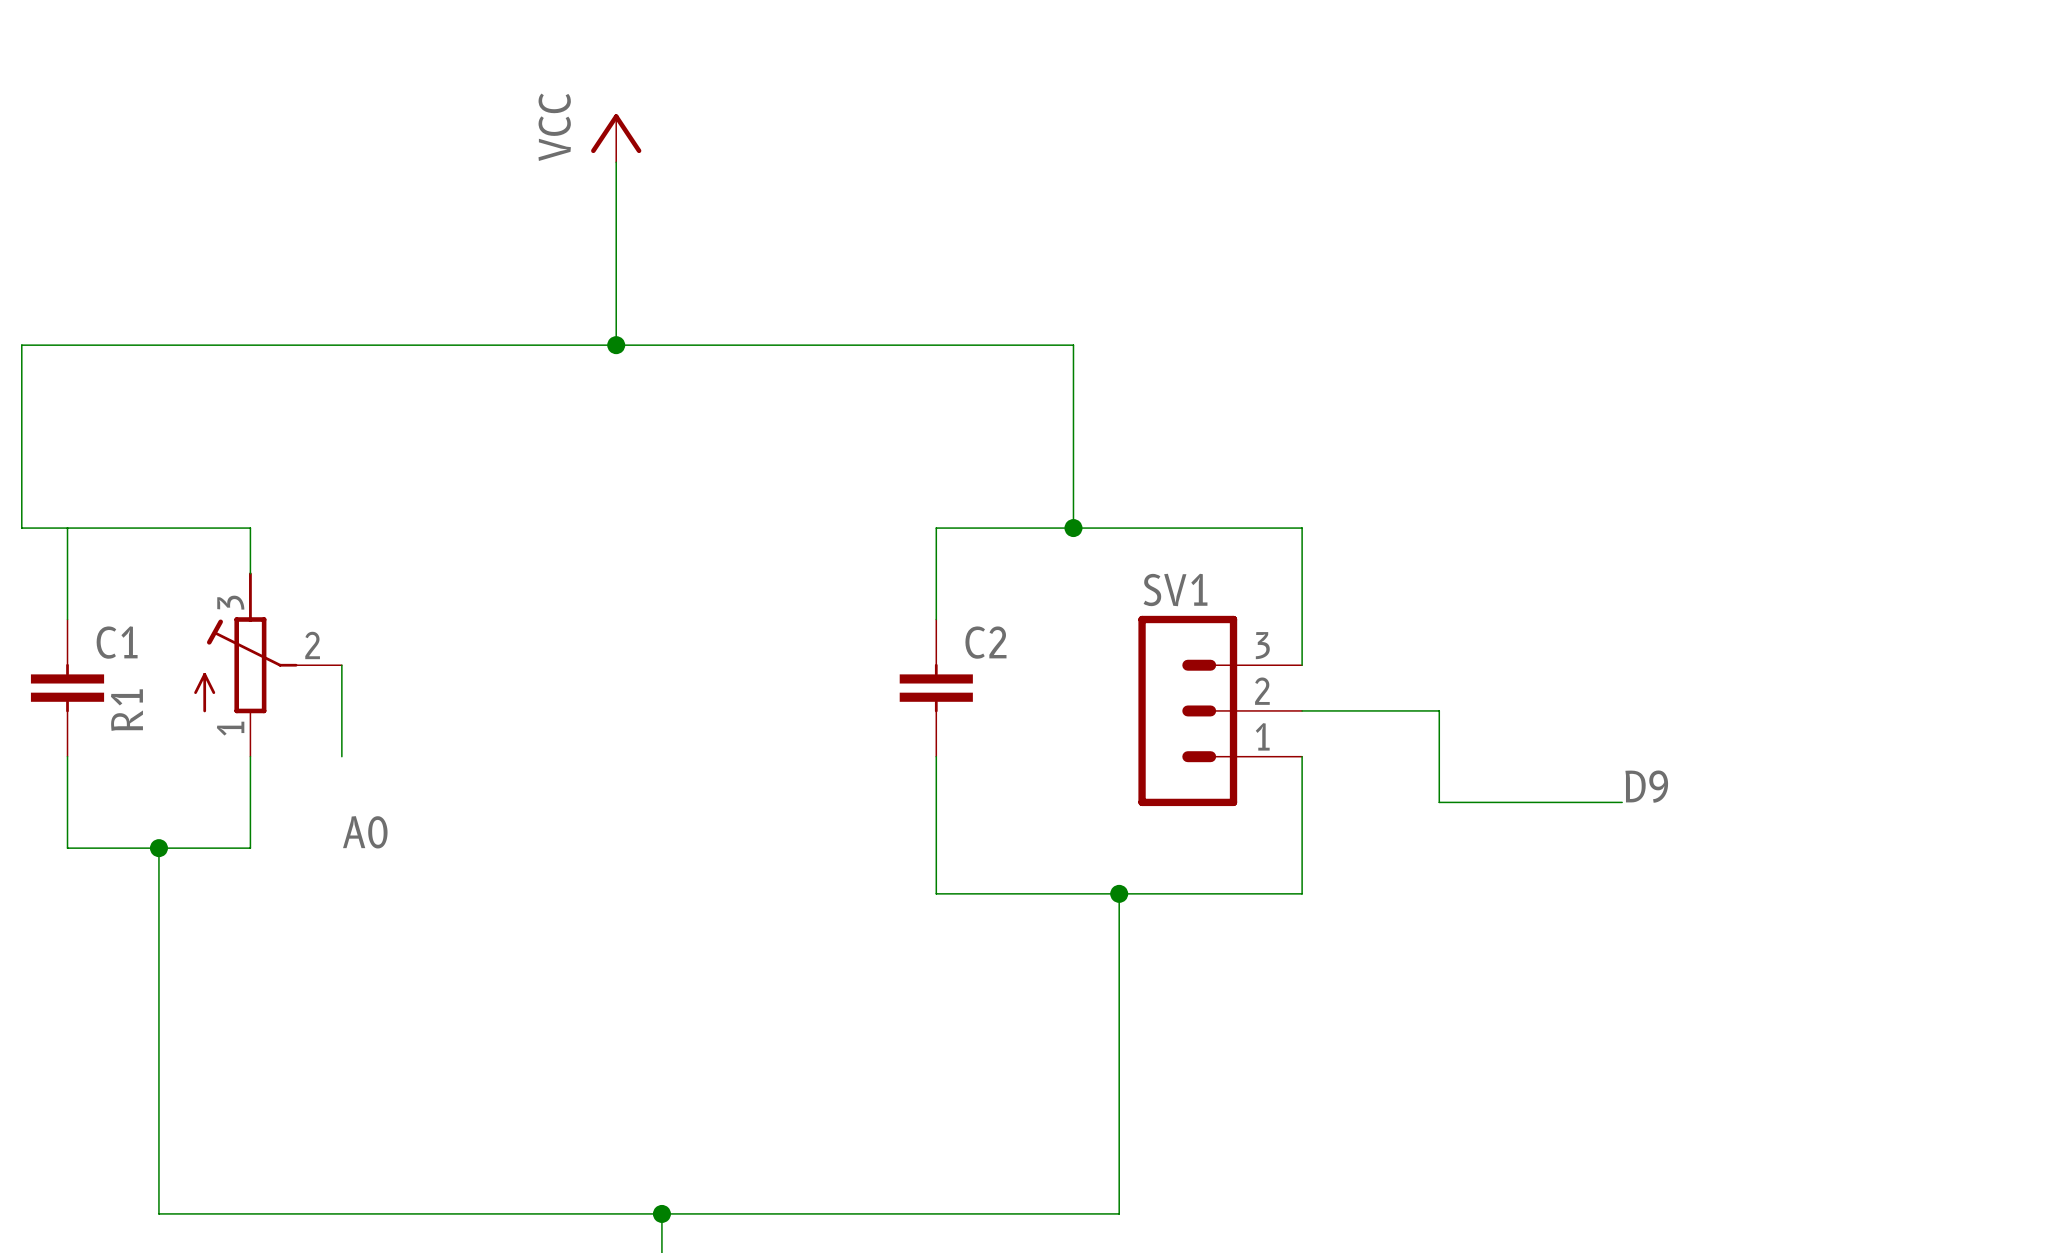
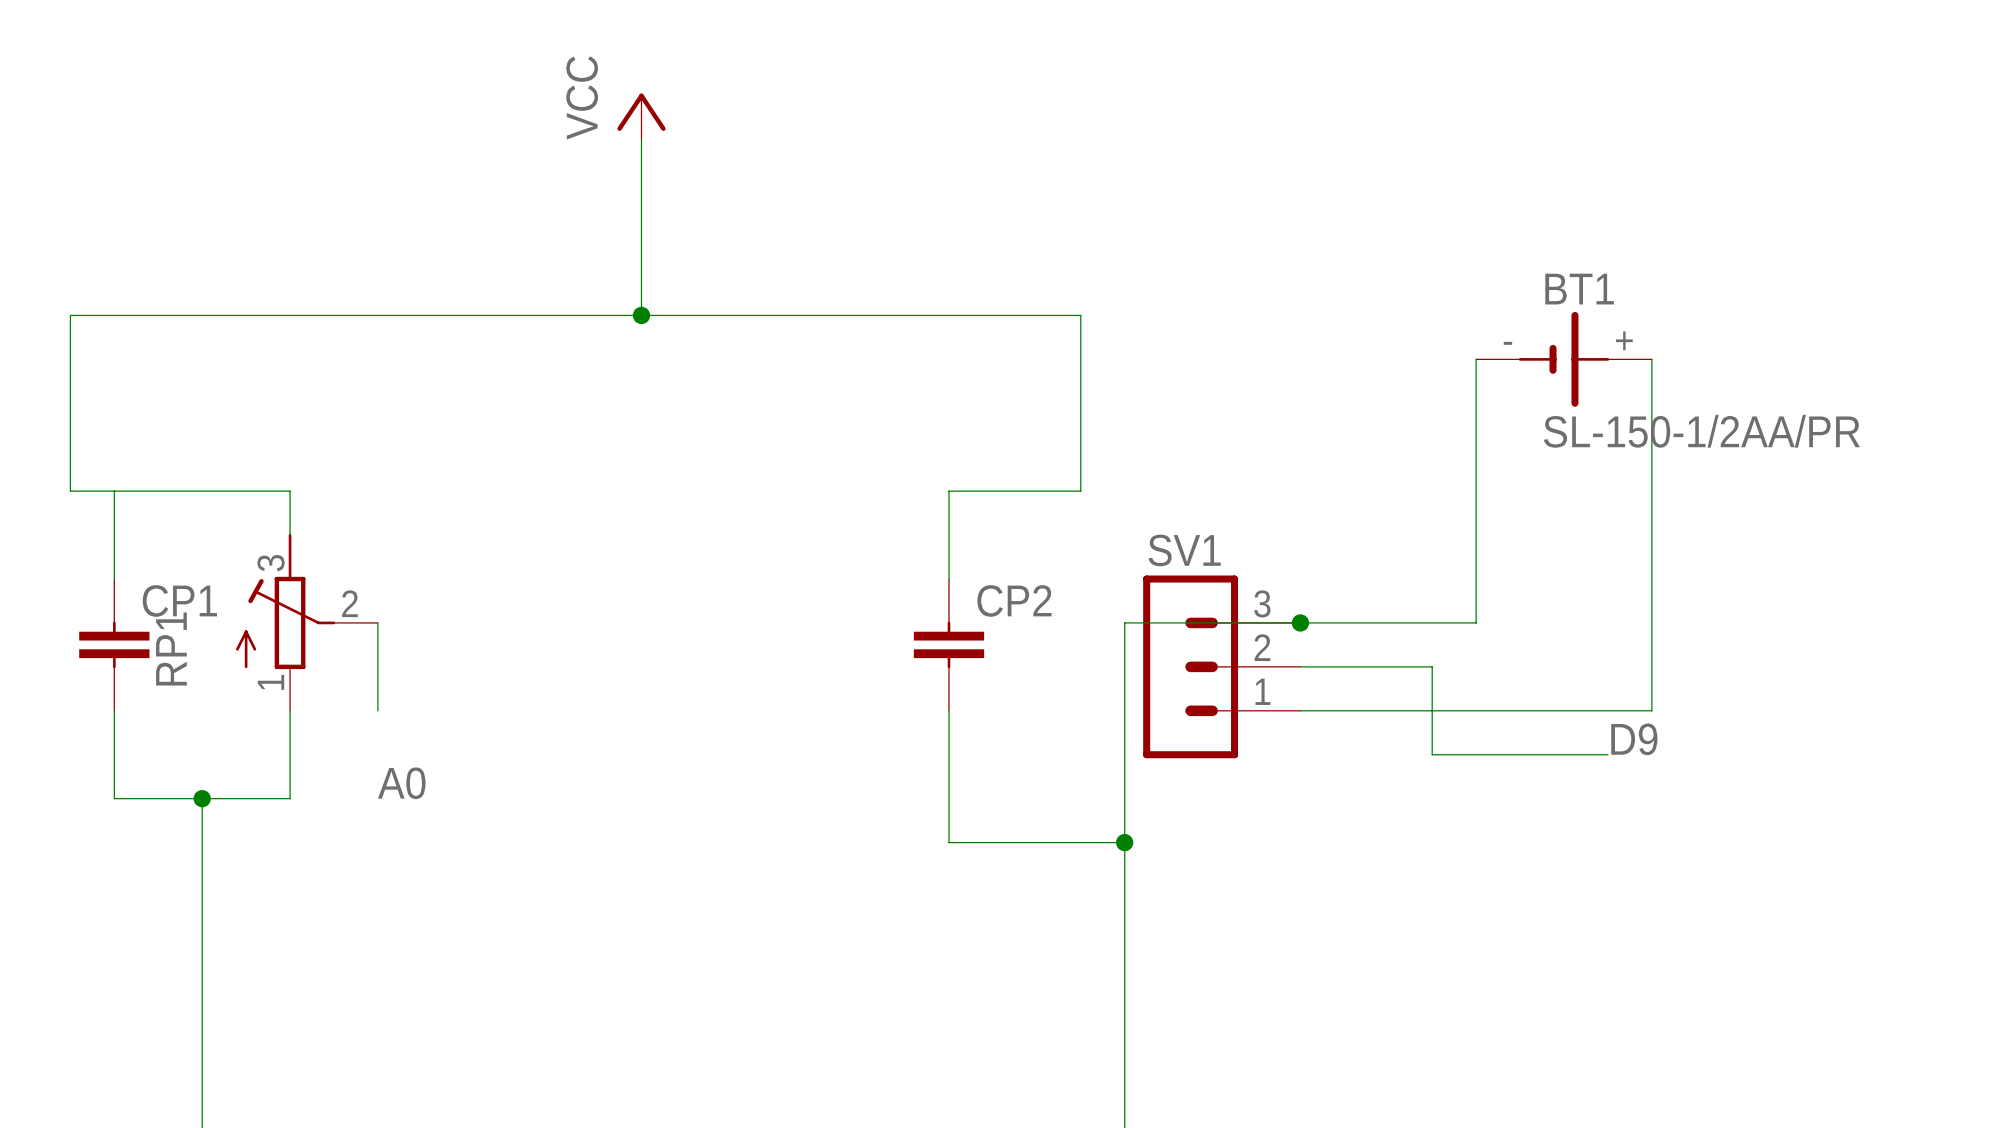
BT1: none -> SL-150-1/2AA/PR (1563, 359)
wire: none -> (1651, 359) (1651, 710) (1300, 710)
wire: (1073, 528) (1302, 528) (1302, 665) -> none
junction: (1073, 528) -> none
C1 name: C1 (117, 642) -> CP1 (179, 600)
C2 name: C2 (985, 642) -> CP2 (1014, 600)
junction: none -> (1300, 622)
R1 name: R1 (126, 710) -> RP1 (171, 649)
wire: (1302, 756) (1302, 893) (1119, 893) -> (1476, 359) (1476, 622) (1124, 622) (1124, 842)

